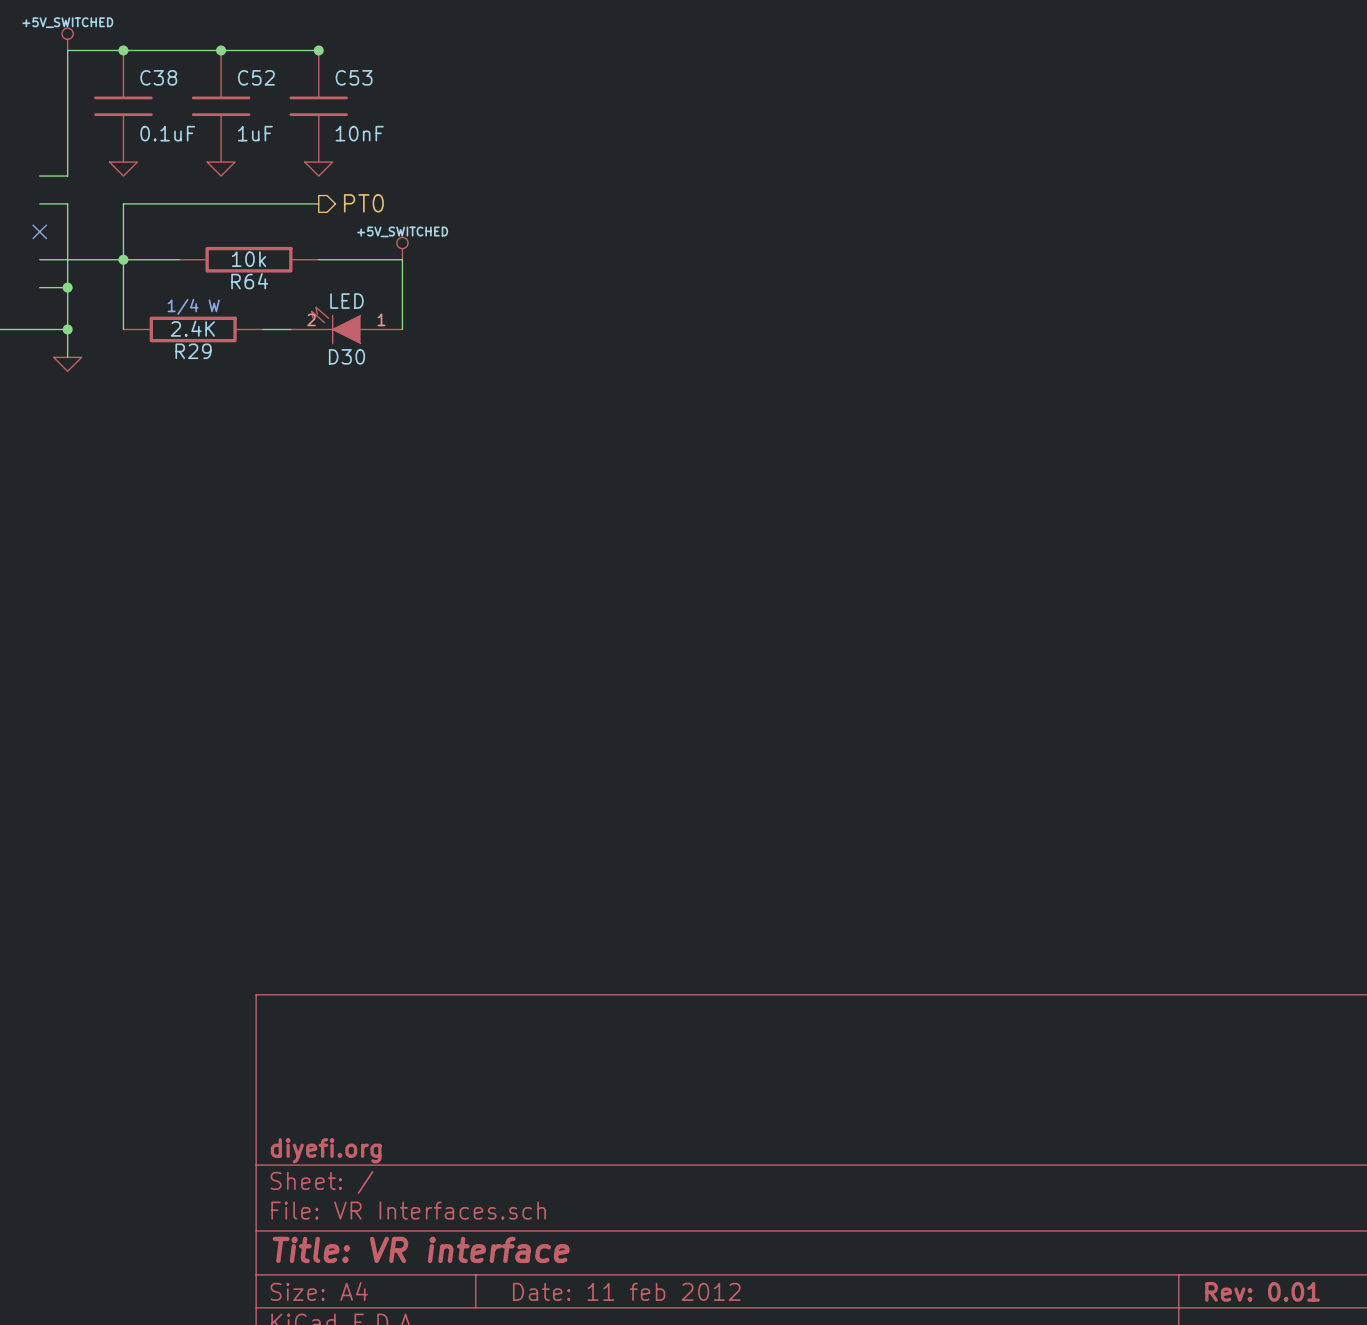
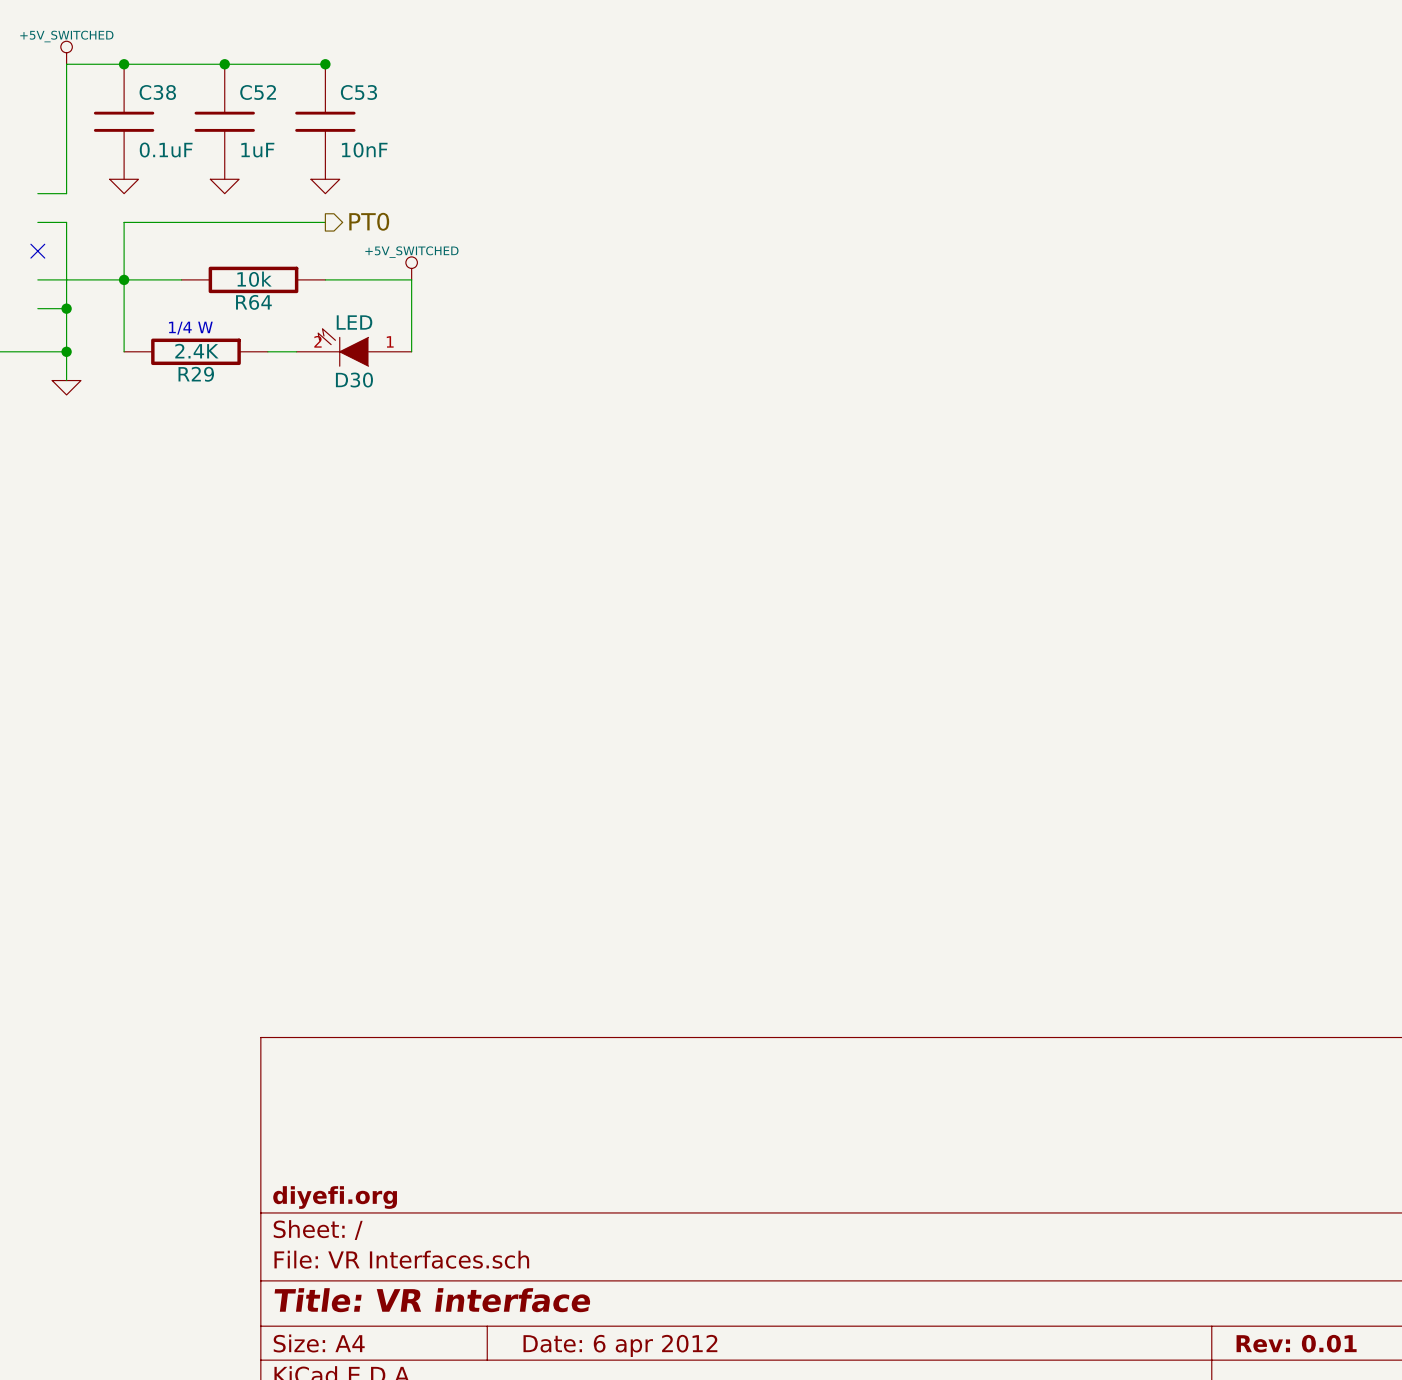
title block: Date: 11 feb 2012 (626, 1291) -> Date: 6 apr 2012 (620, 1345)

